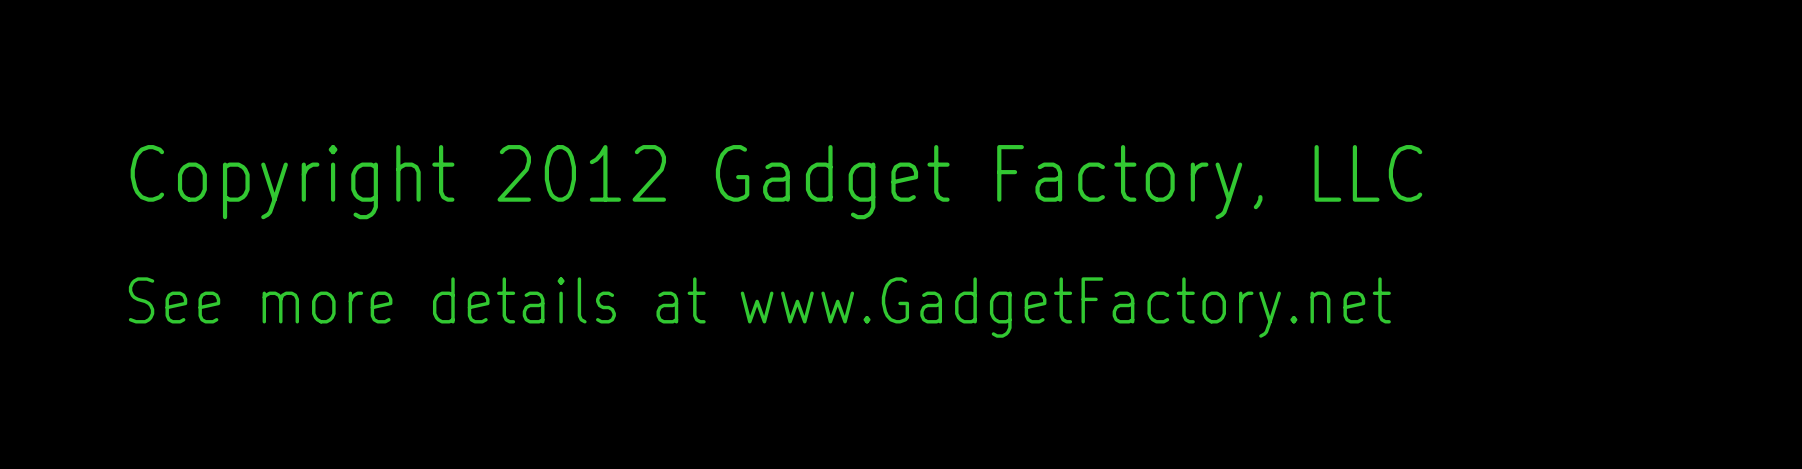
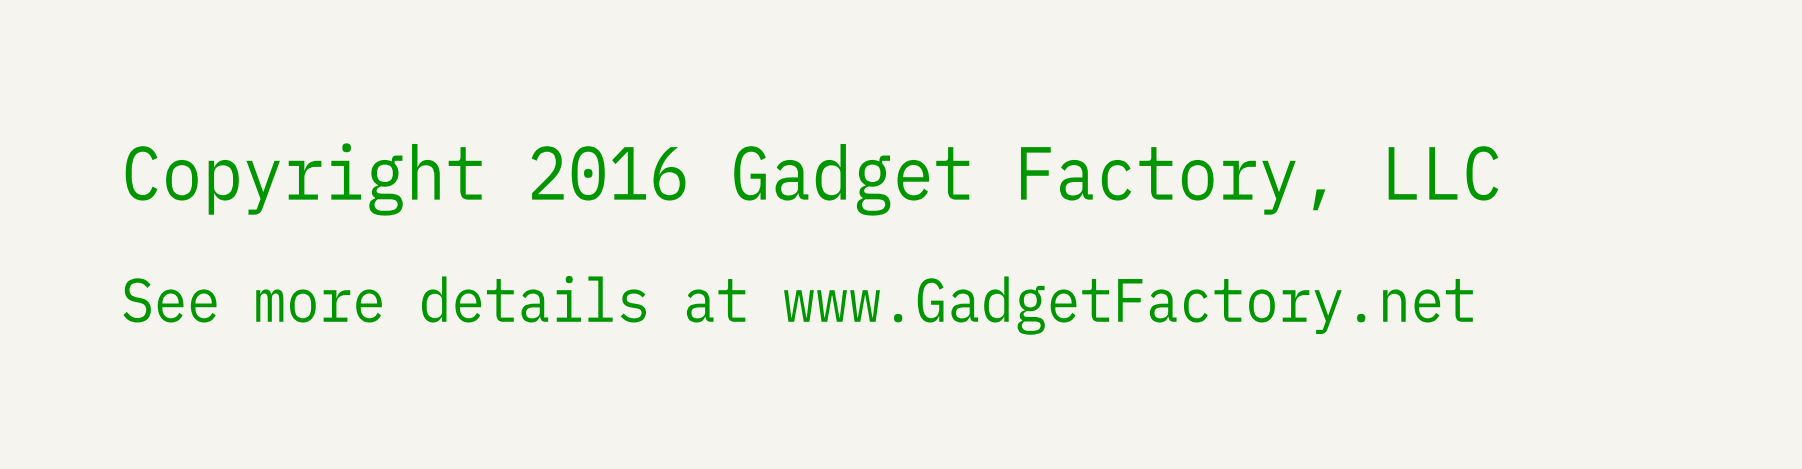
text: Copyright 2012 Gadget Factory, LLC (776, 182) -> Copyright 2016 Gadget Factory, LLC (811, 179)

